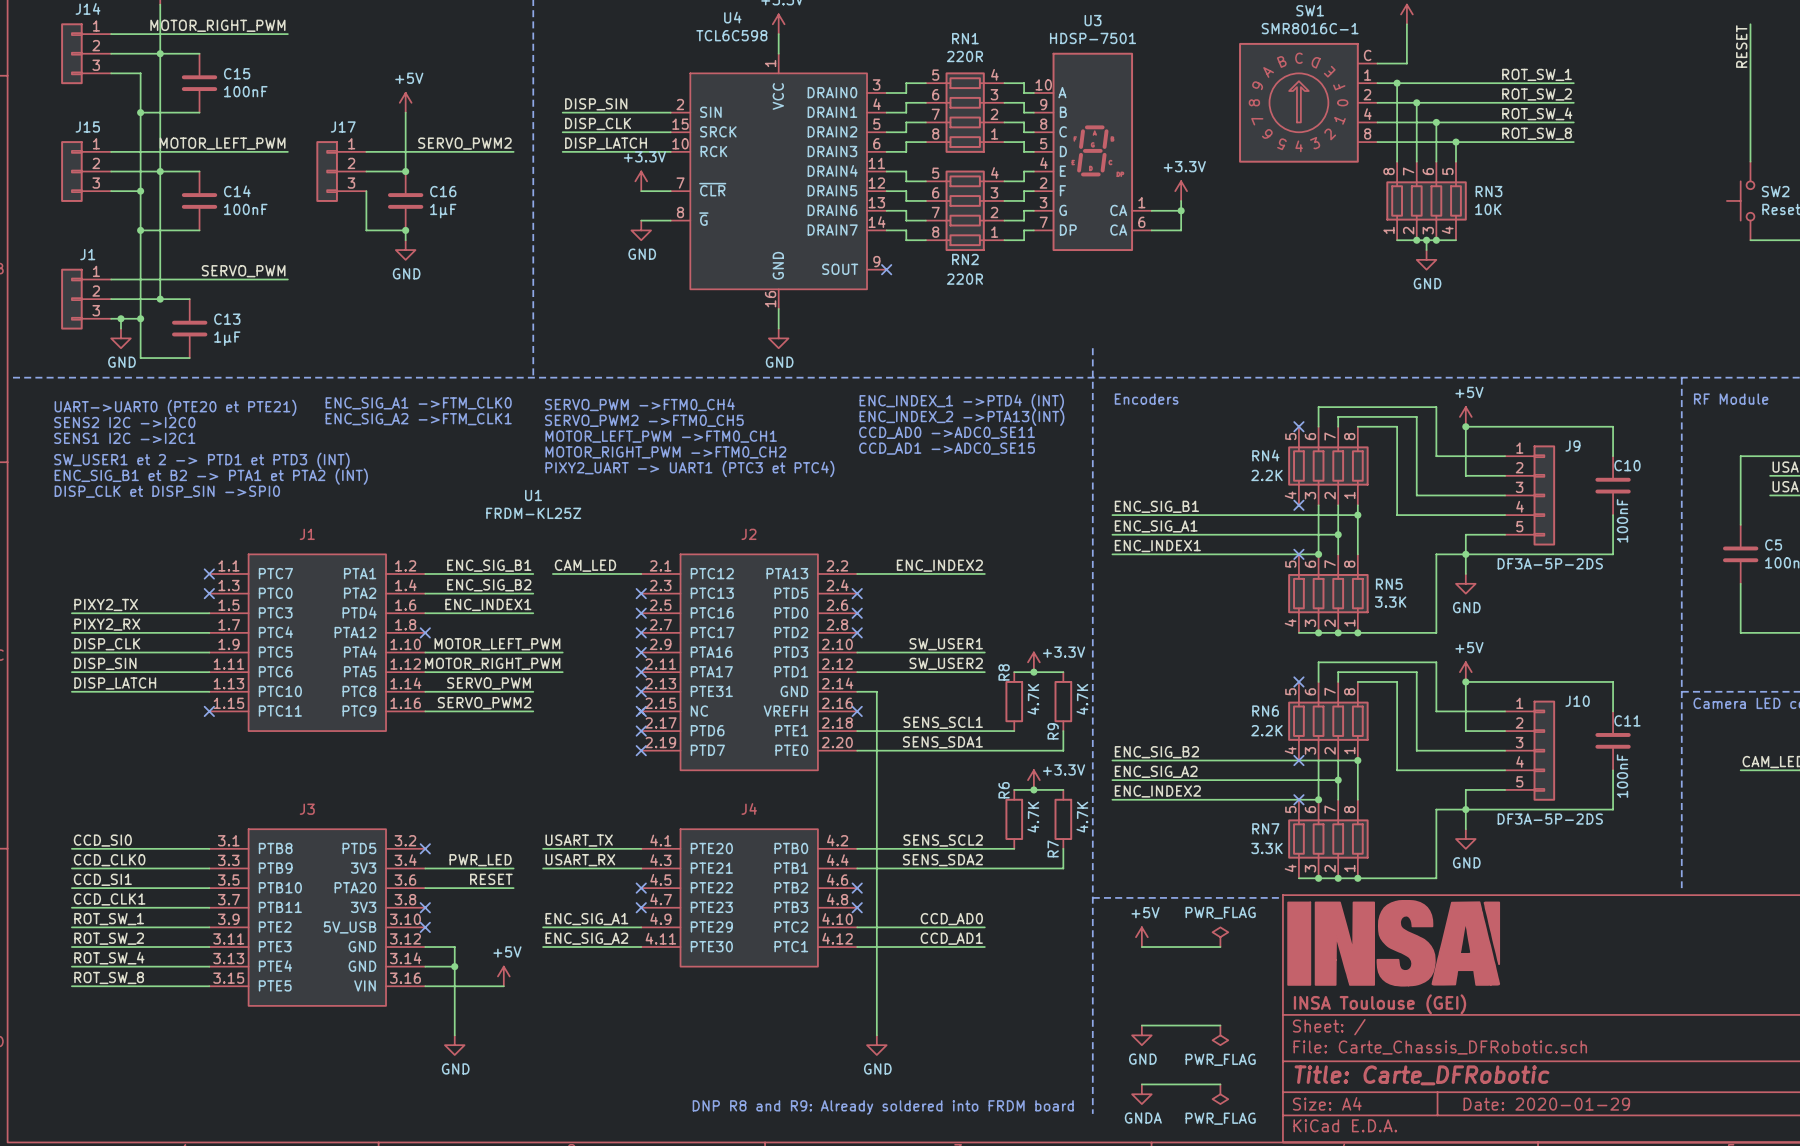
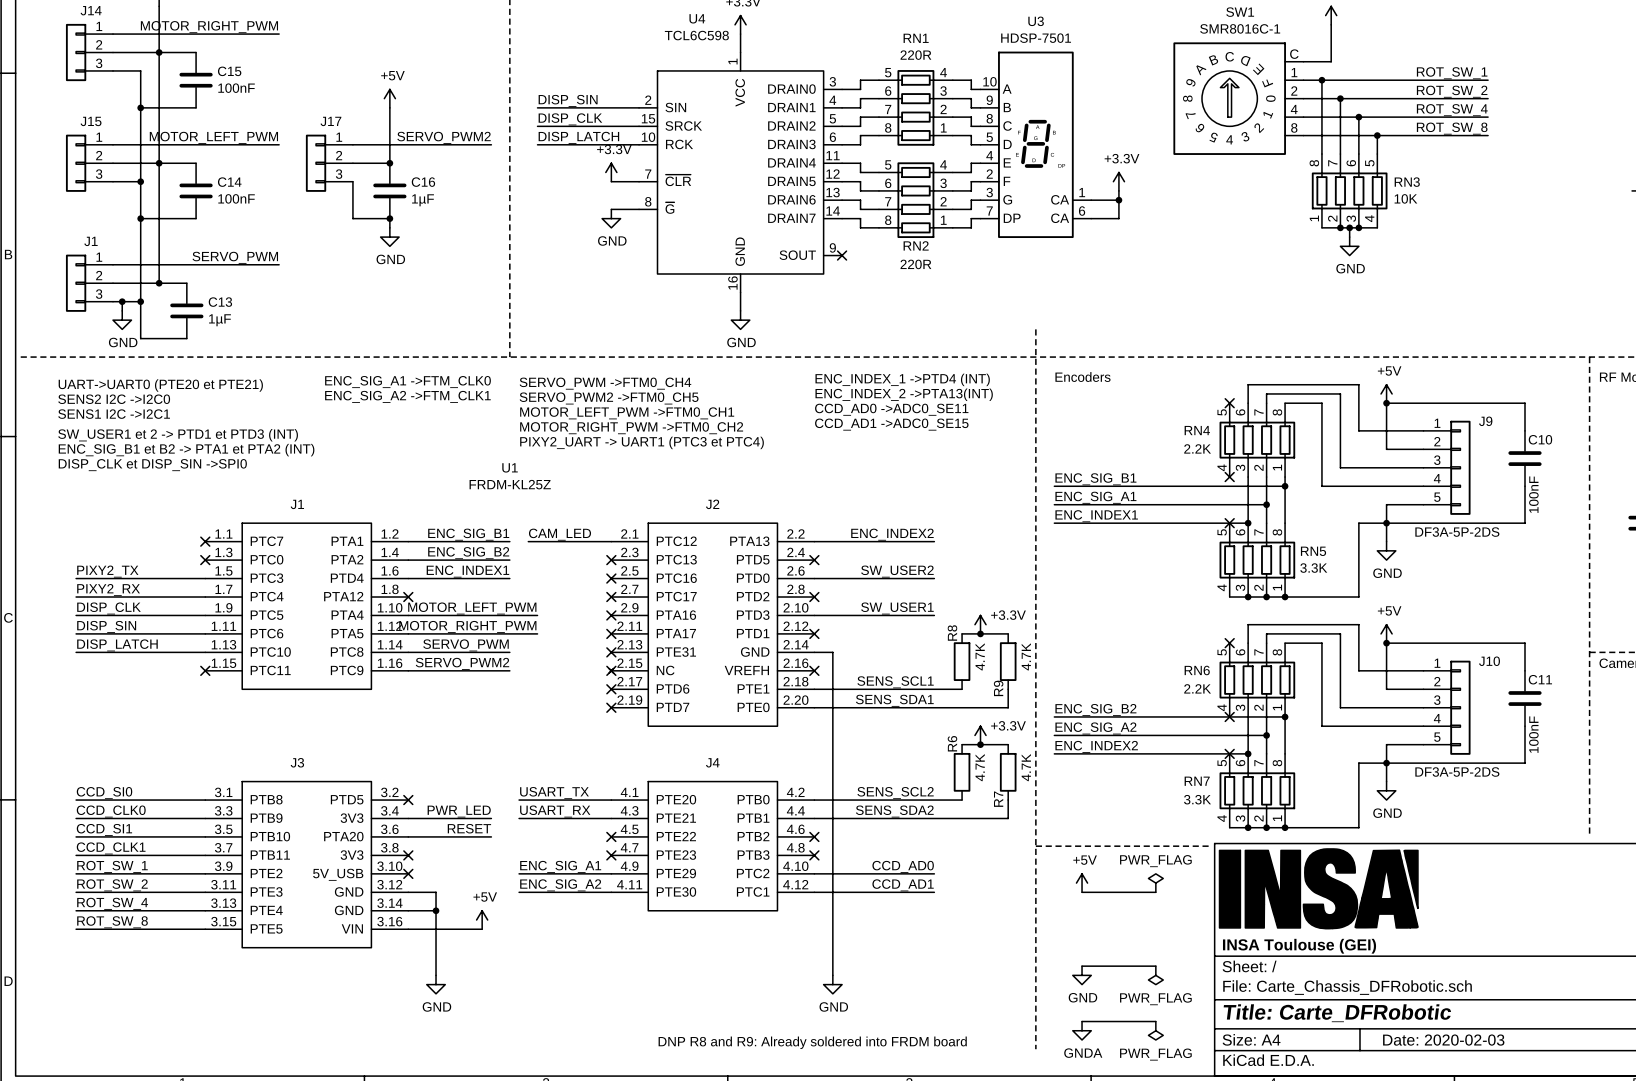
no-connect mark: (857, 613) -> none
label position: SW_USER2 (946, 663) -> SW_USER2 (897, 571)
wire: (857, 672) (984, 672) -> (814, 578) (934, 578)
no-connect mark: none -> (814, 633)
title block: Date: 2020-01-29 (1546, 1104) -> Date: 2020-02-03 (1443, 1040)

